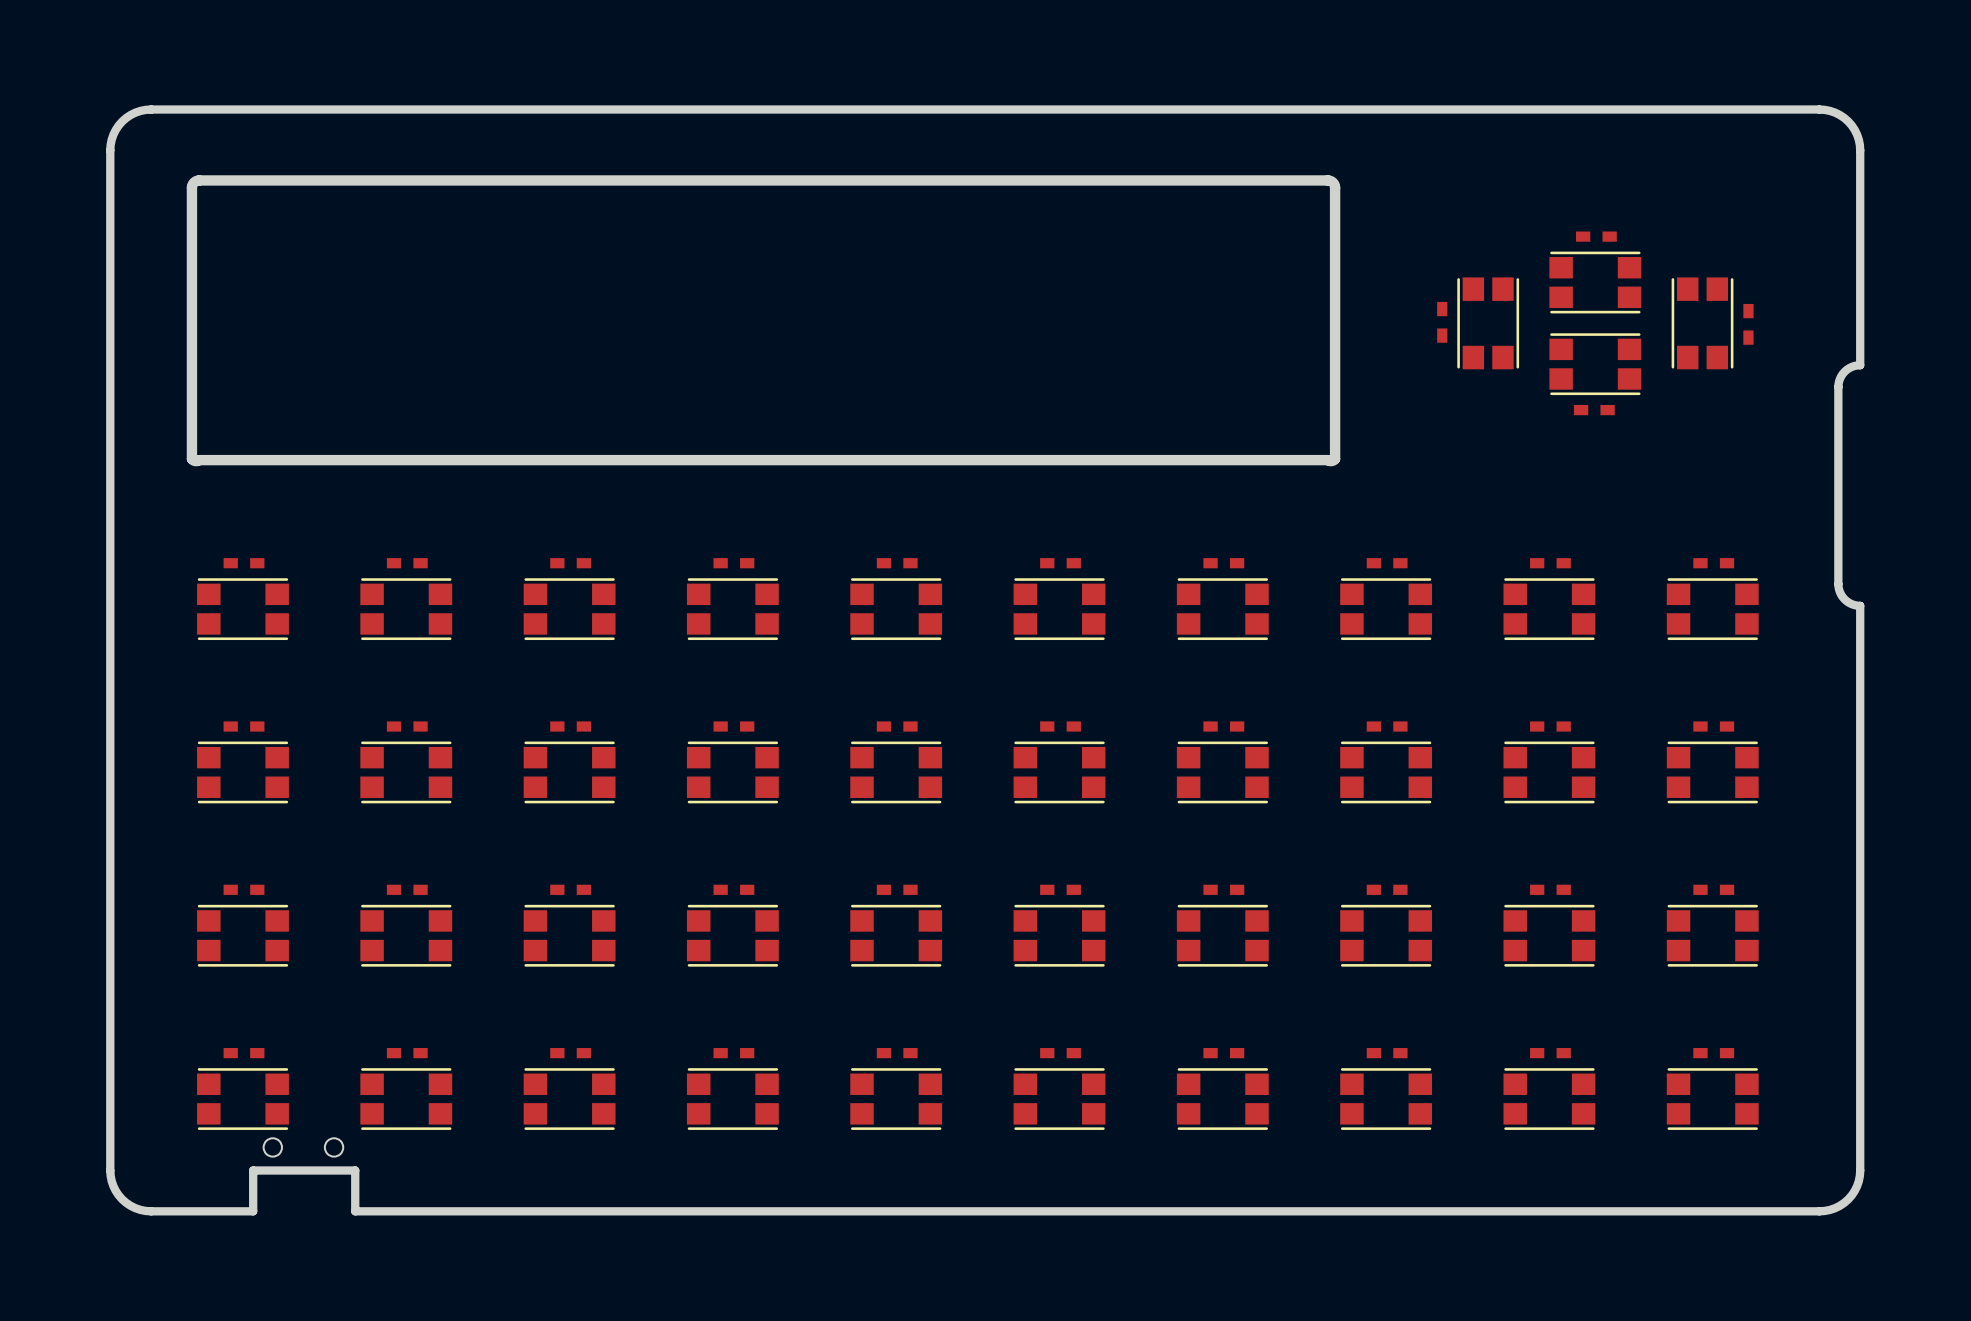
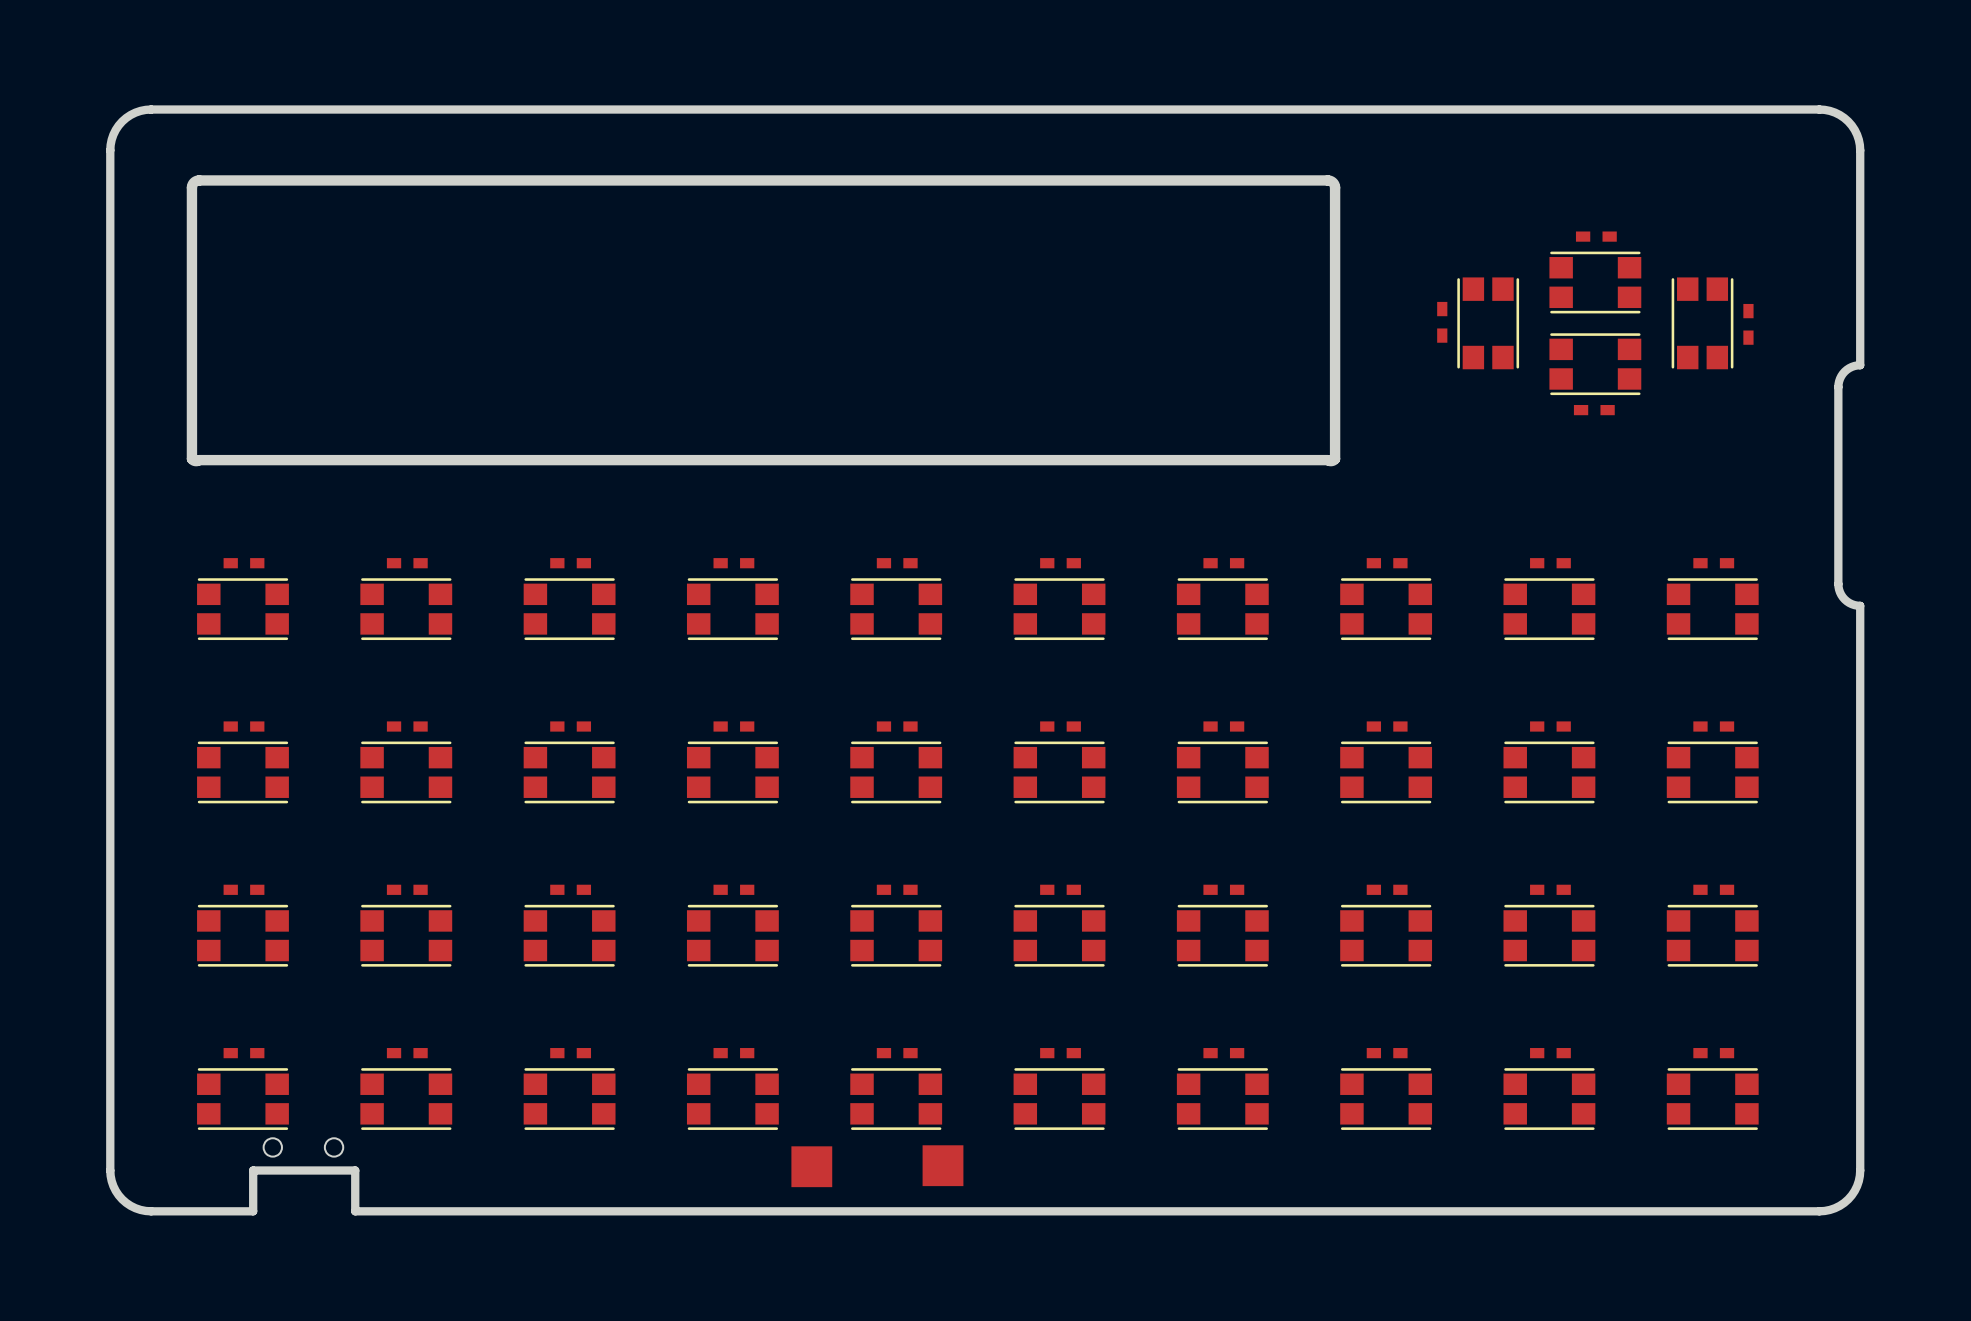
part: none -> (942, 1165)
part: none -> (811, 1166)

